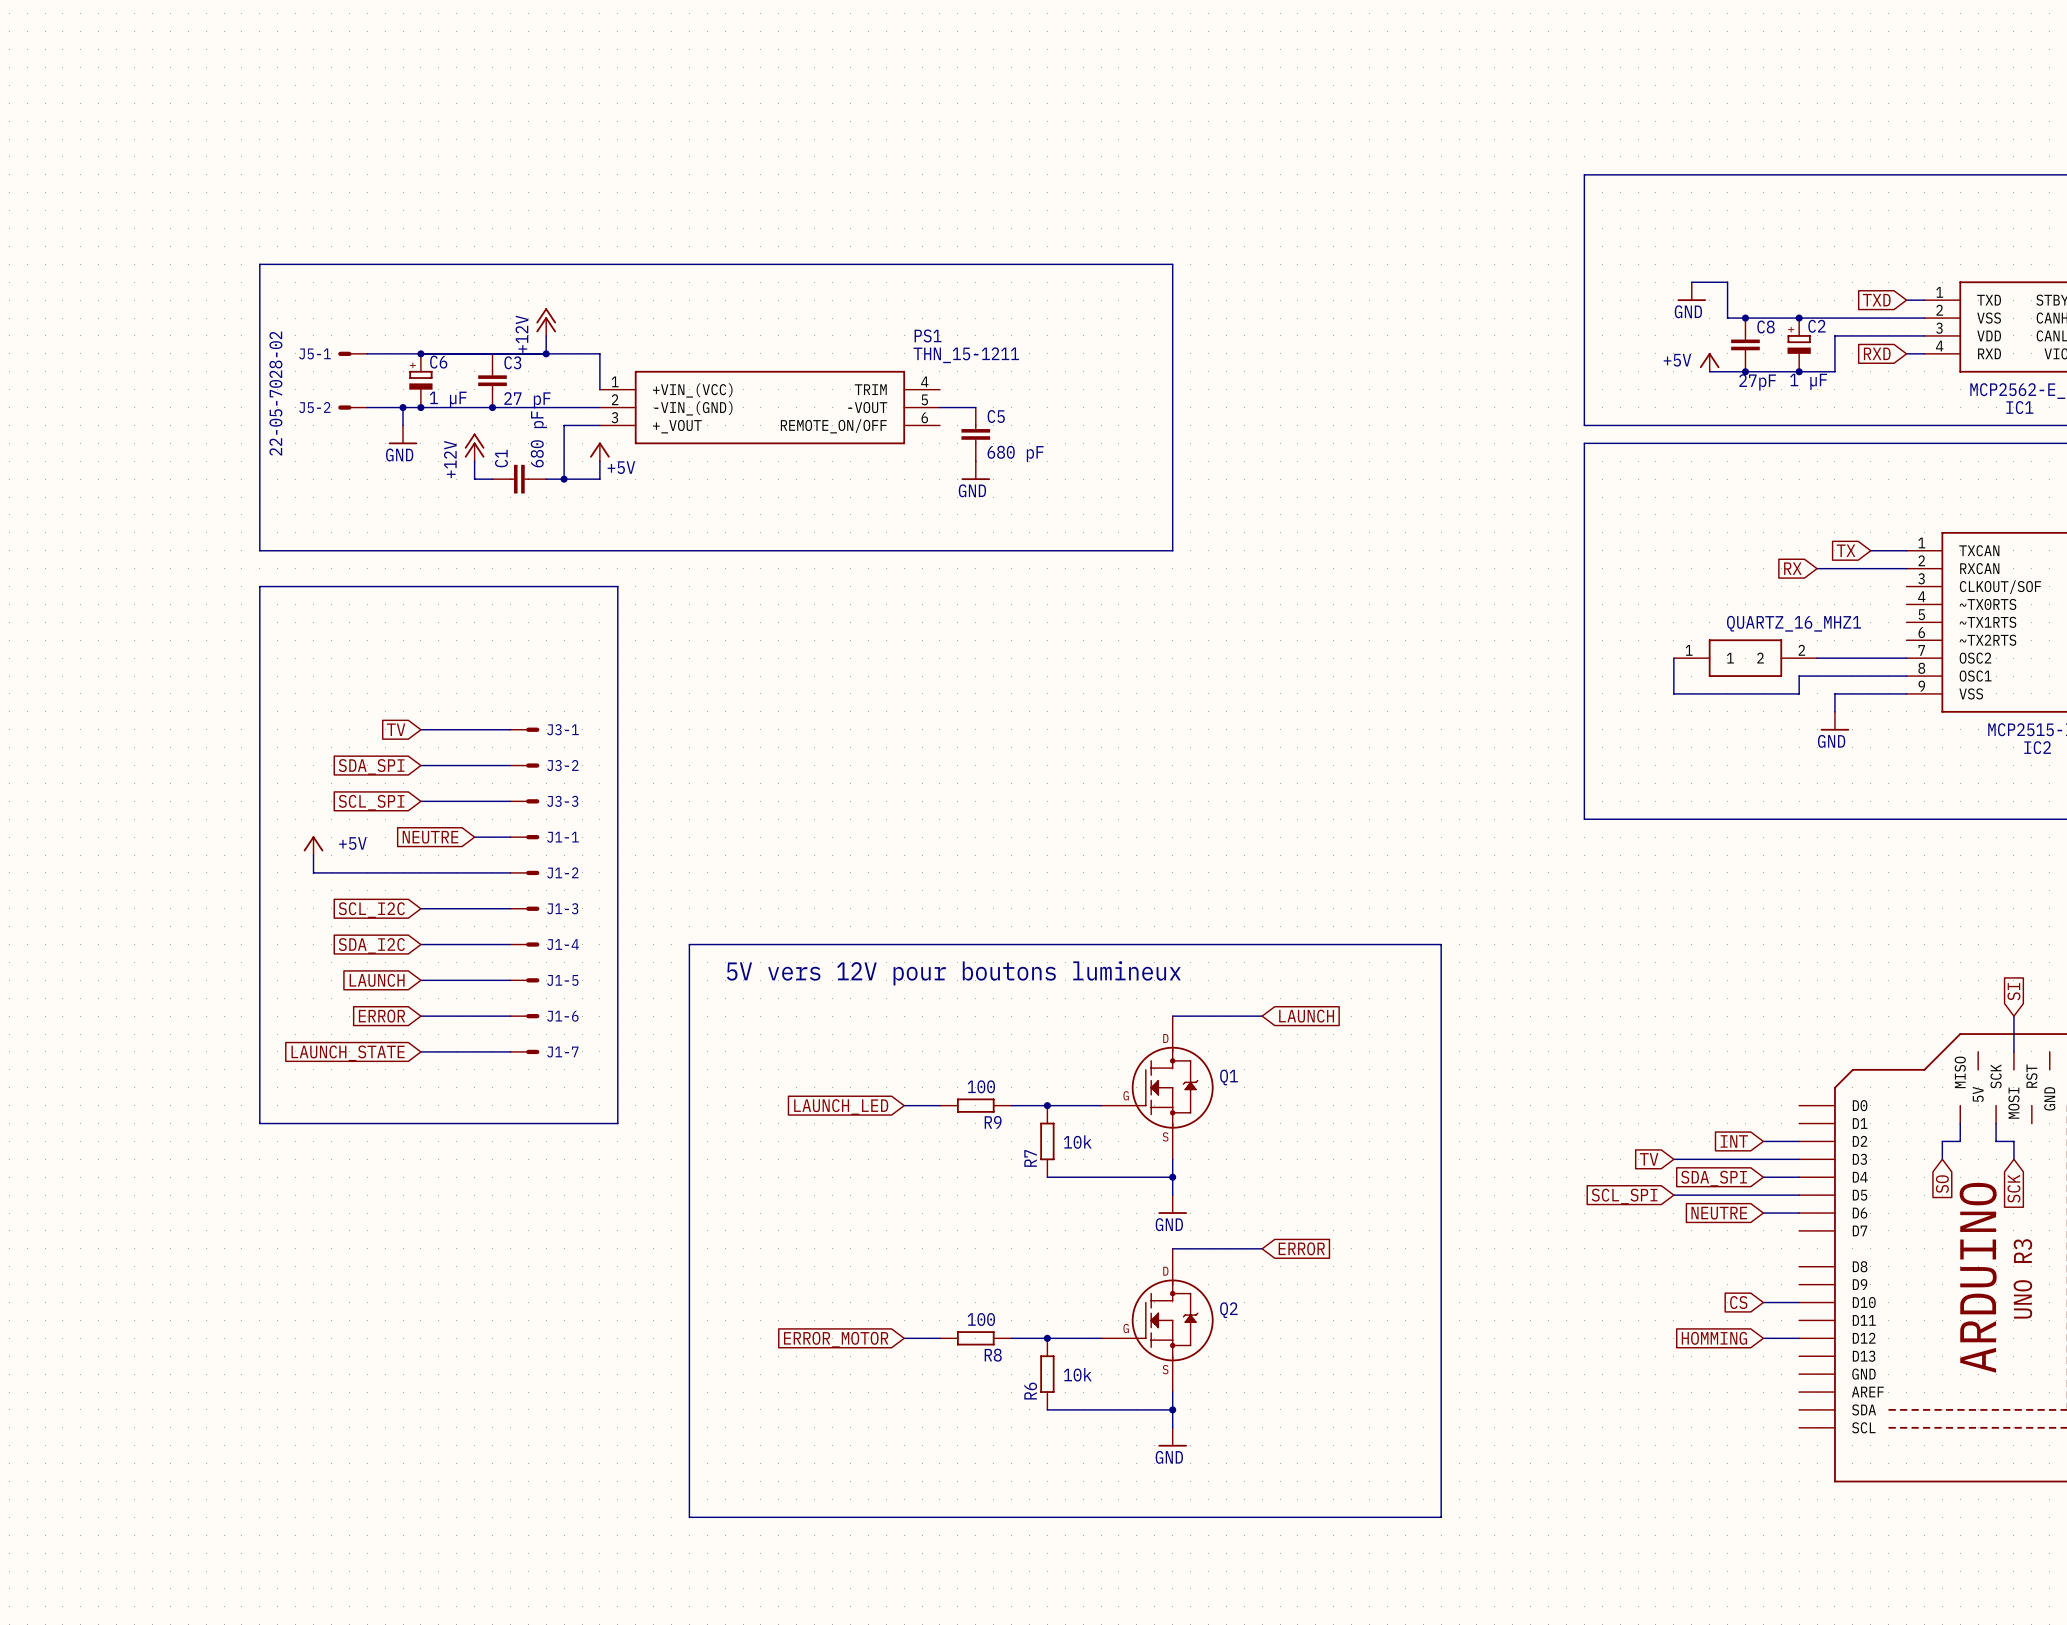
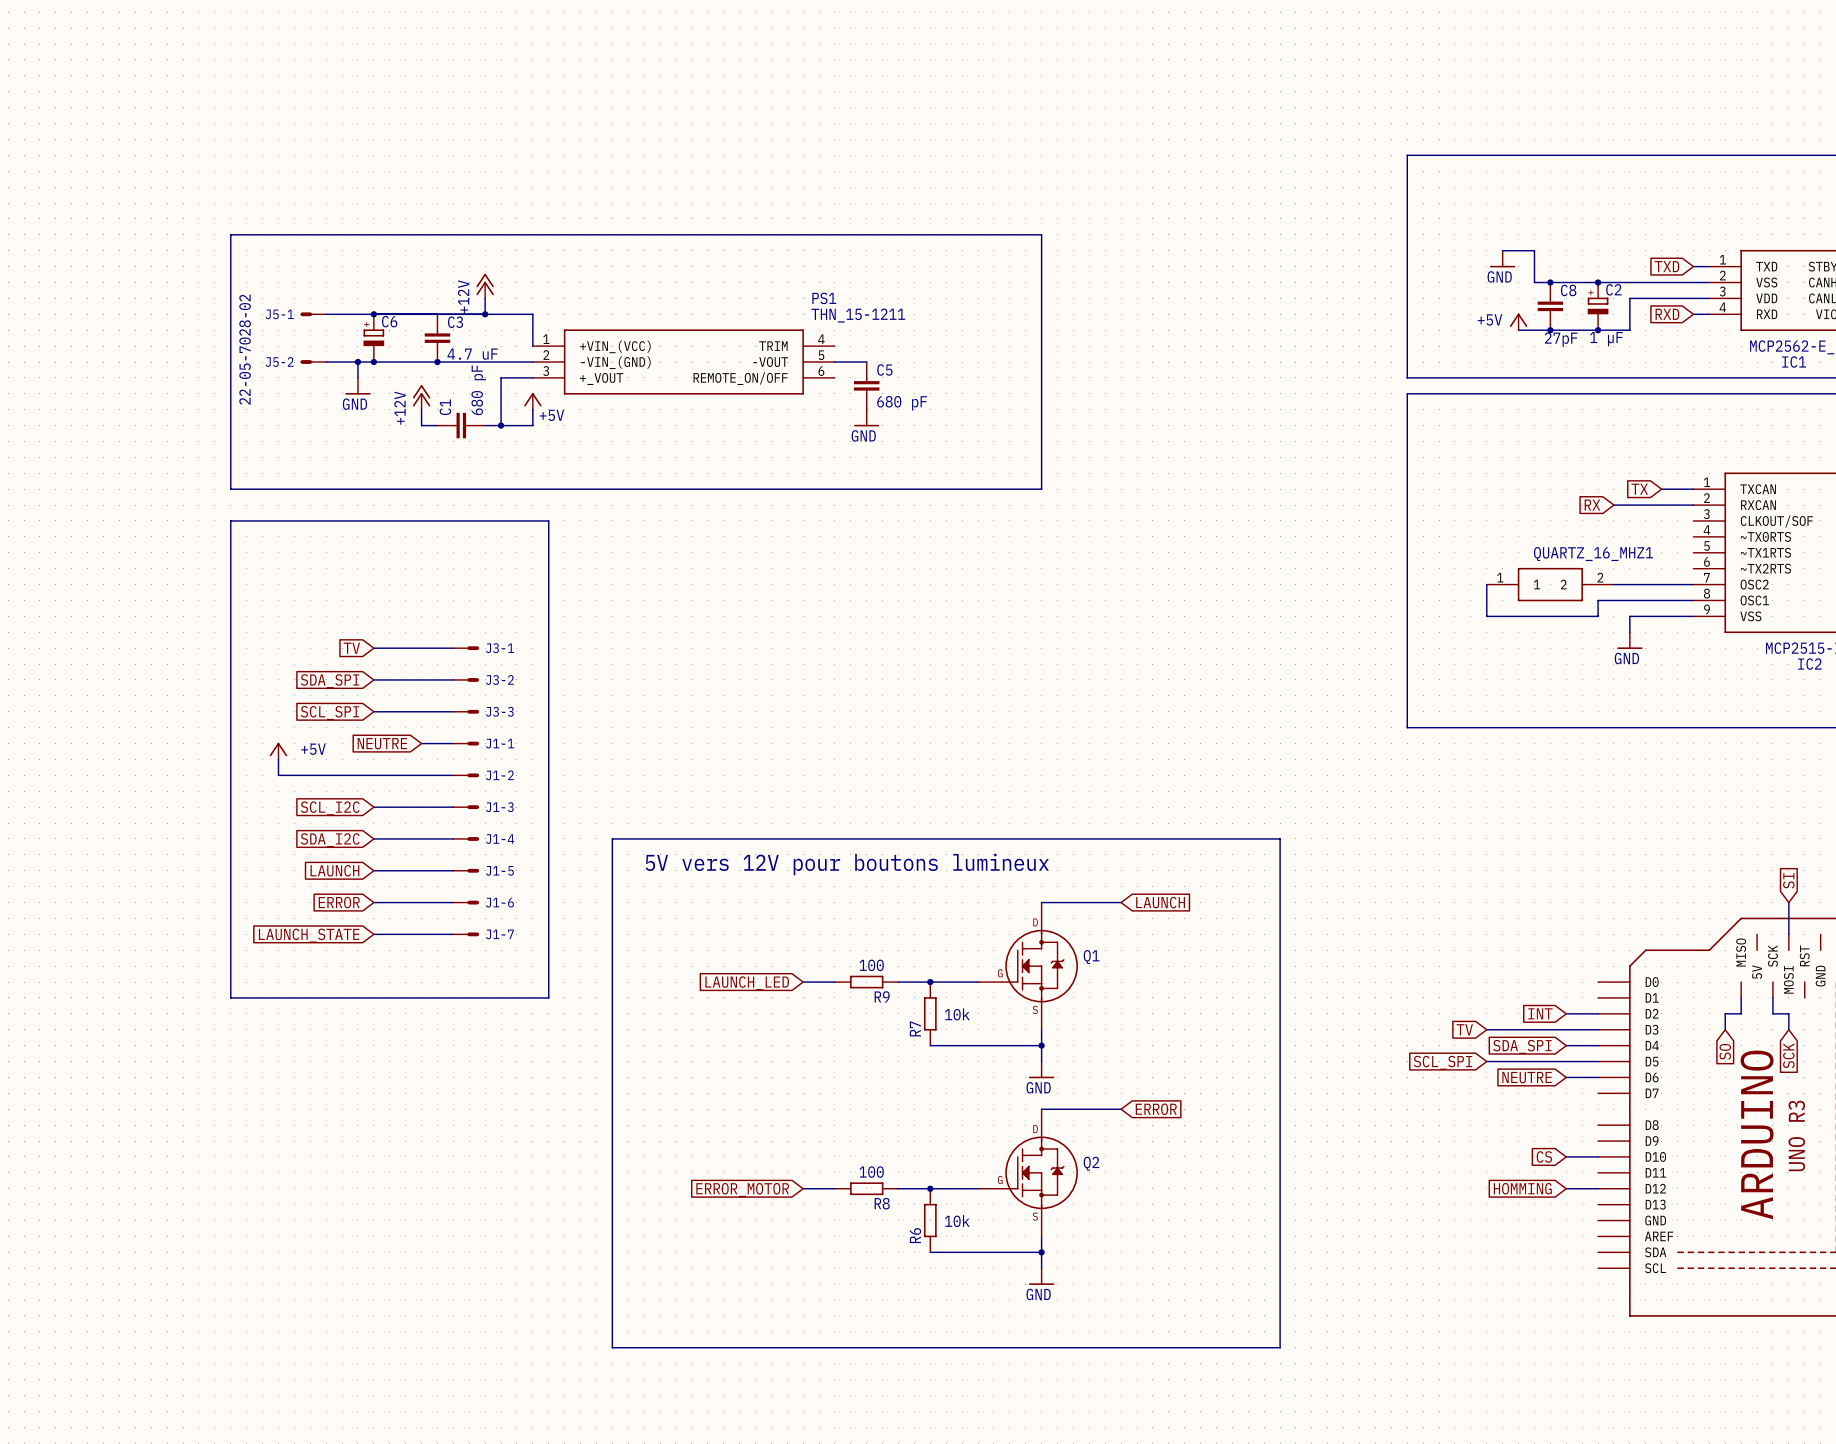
C6 value: 1 µF (448, 399) -> none
C3 value: 27 pF (527, 400) -> 4.7 uF (472, 354)

